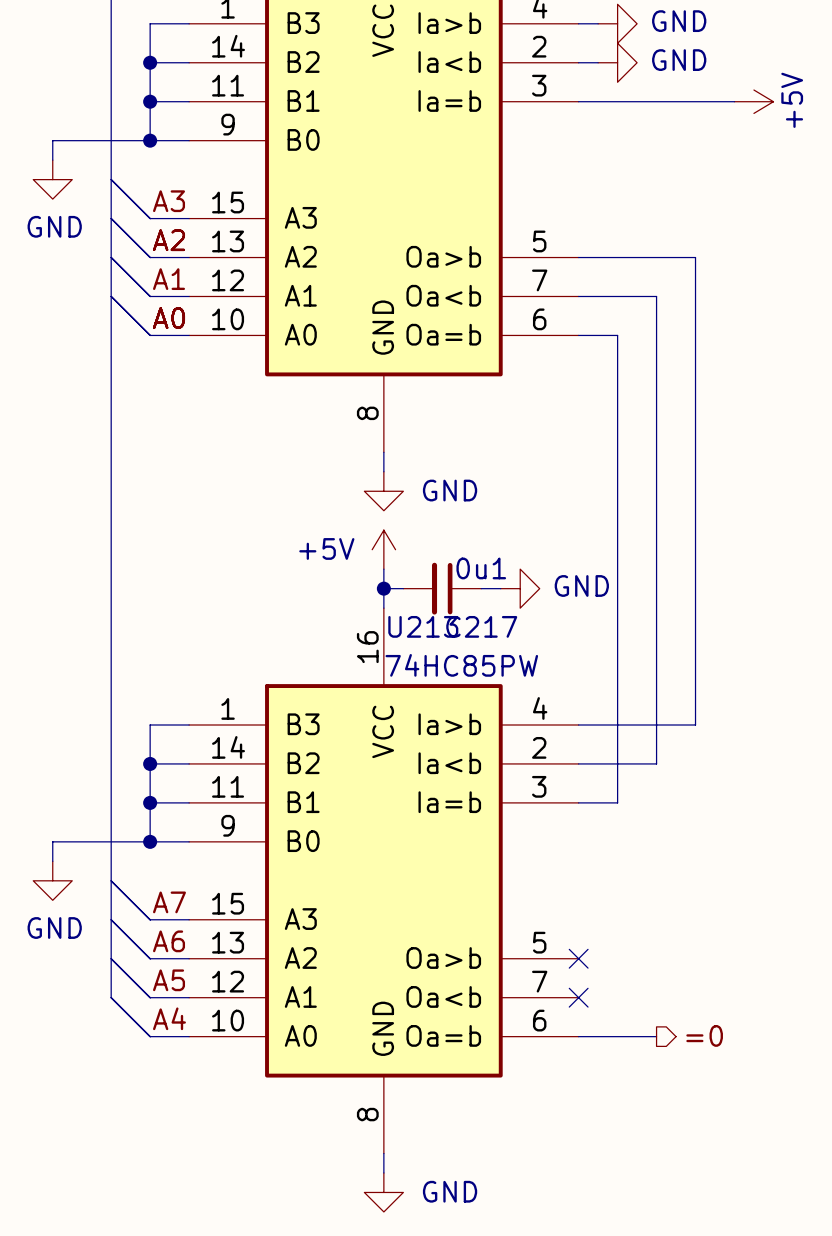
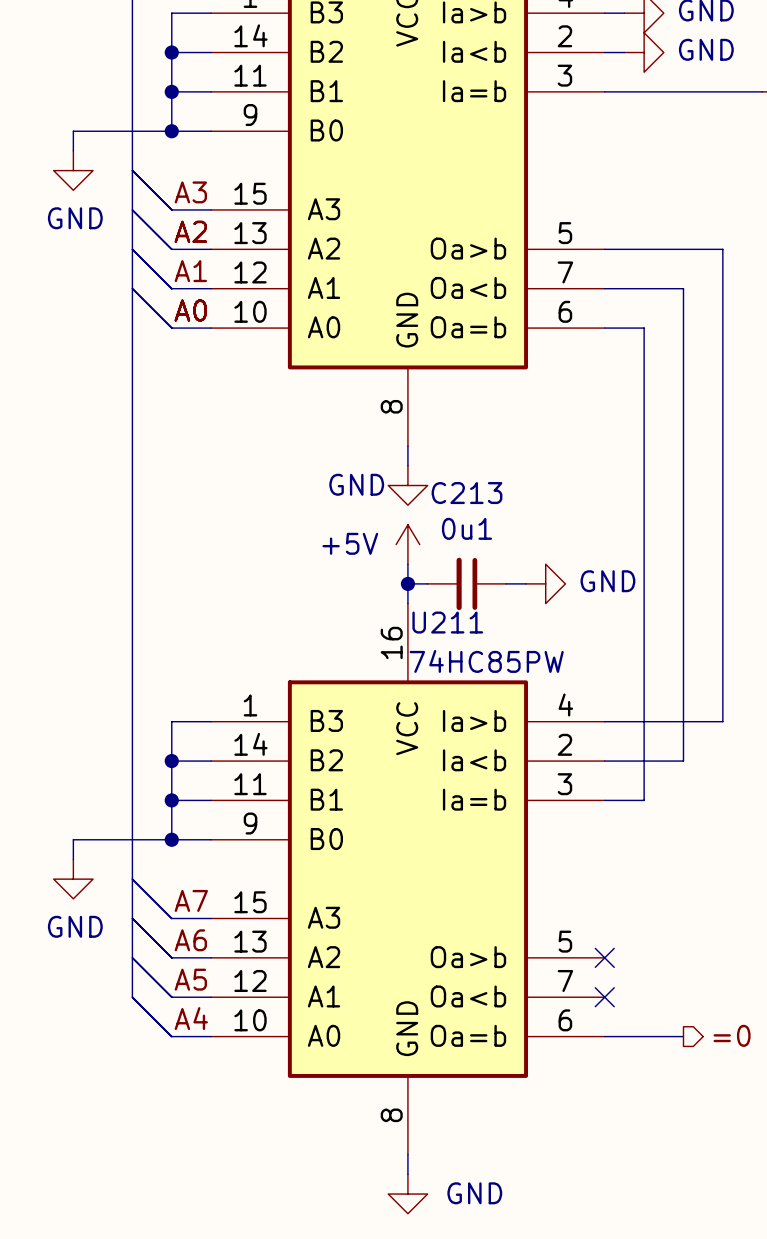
power symbol text position: GND (450, 490) -> GND (356, 484)
C217 value position: 0u1 (481, 568) -> 0u1 (466, 528)
U213 name: U213 (423, 626) -> U211 (447, 622)
C217 name: C217 (481, 626) -> C213 (466, 493)

